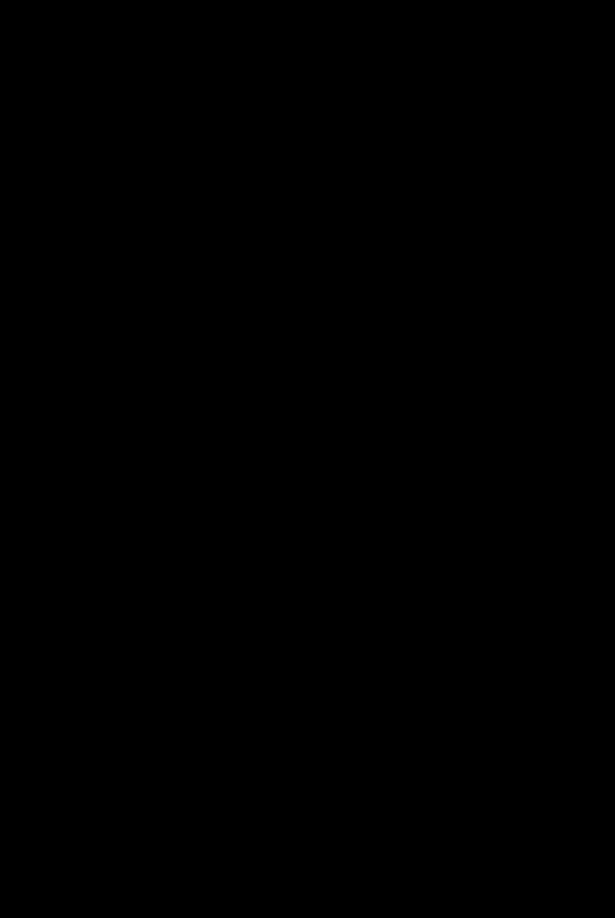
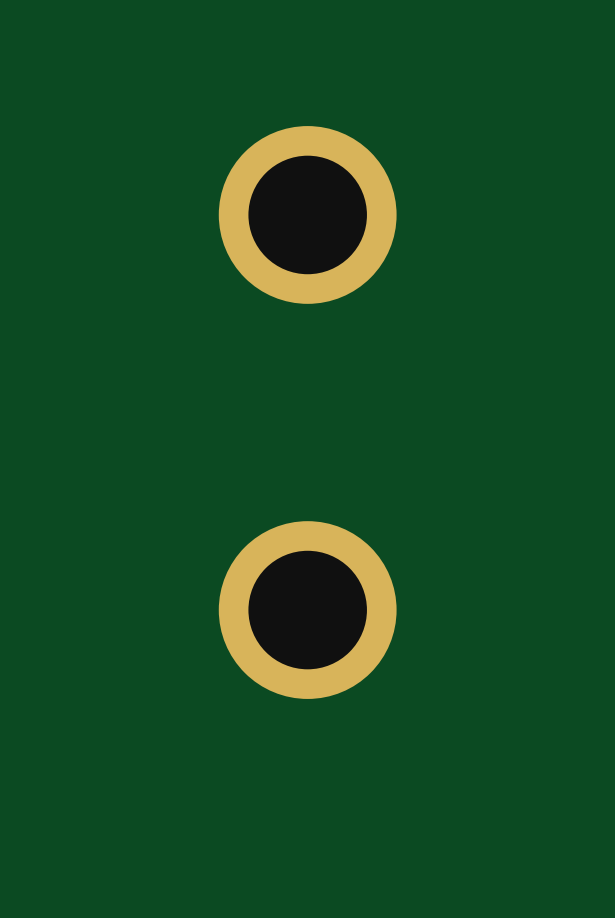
part: none -> (307, 214)
part: none -> (307, 610)

